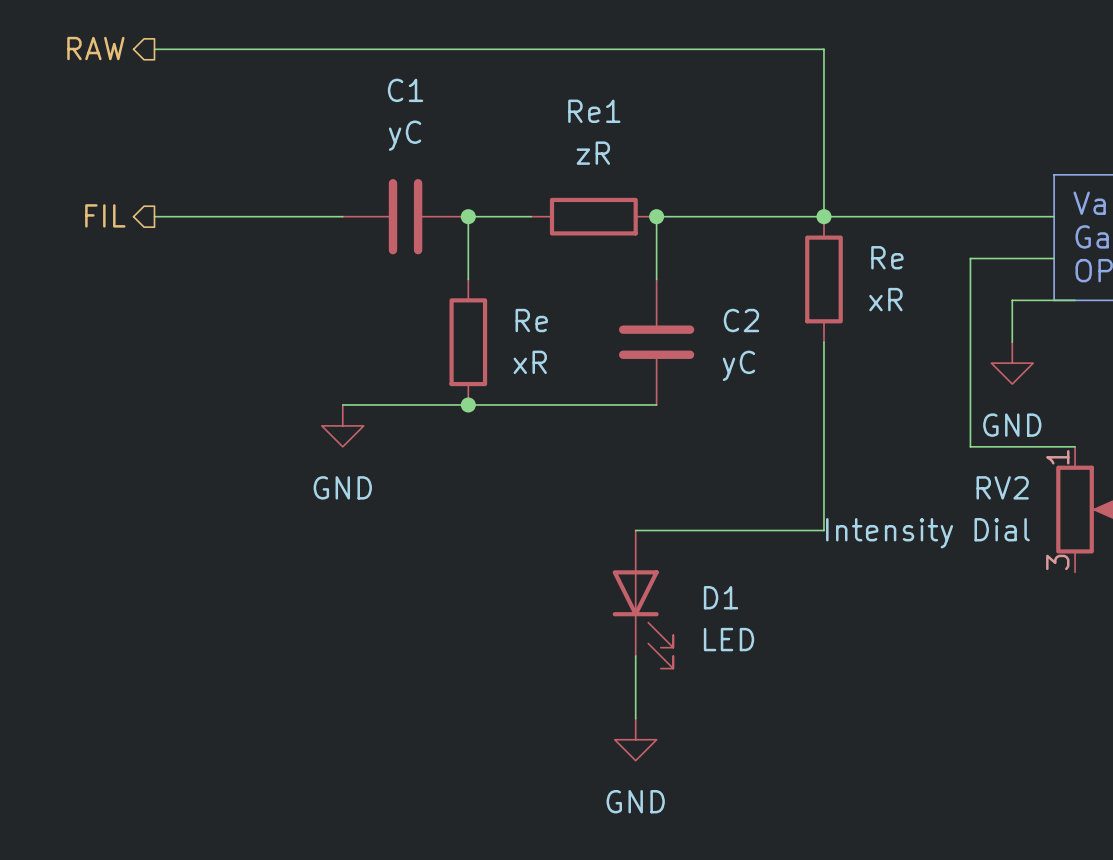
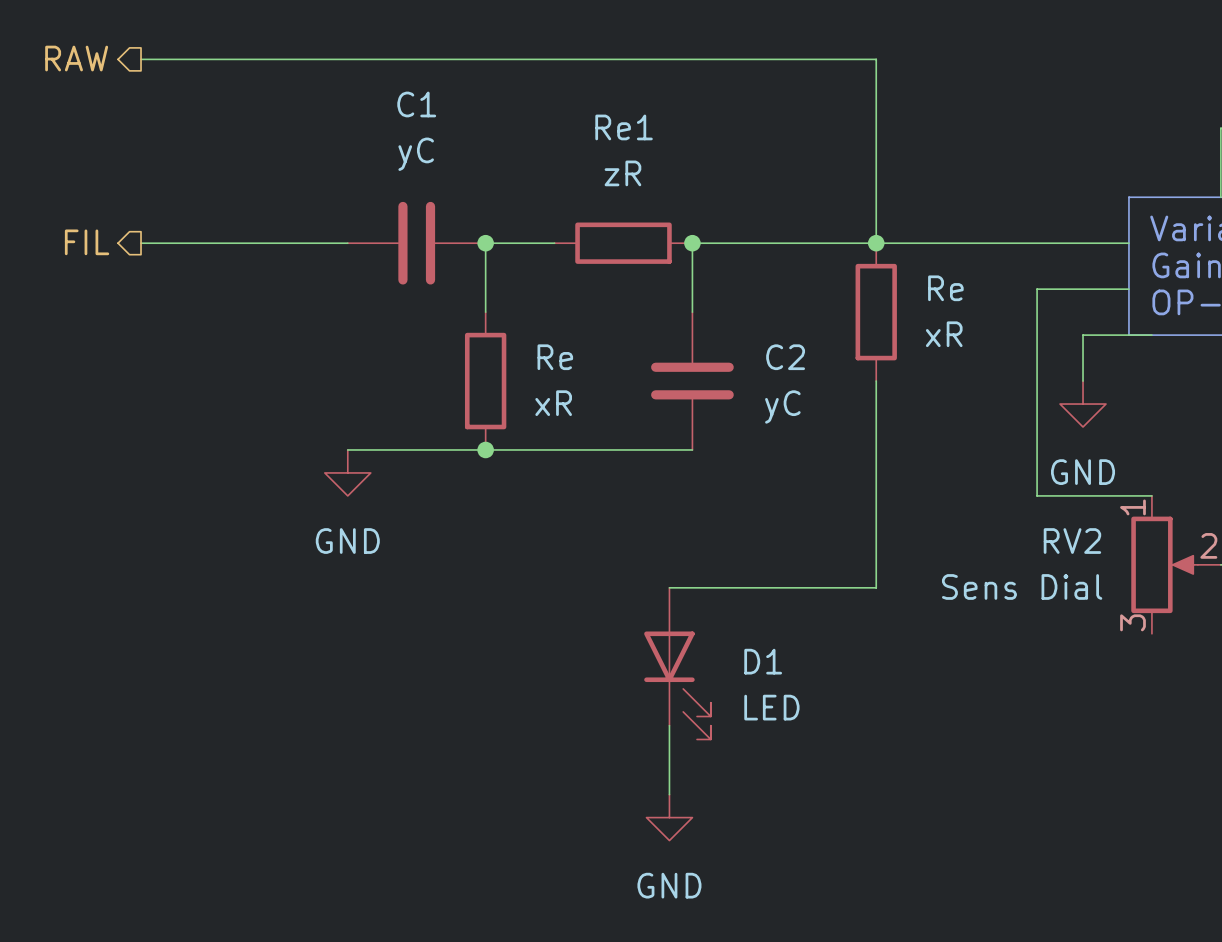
RV2 value: Intensity Dial (927, 533) -> Sens Dial (1022, 586)

